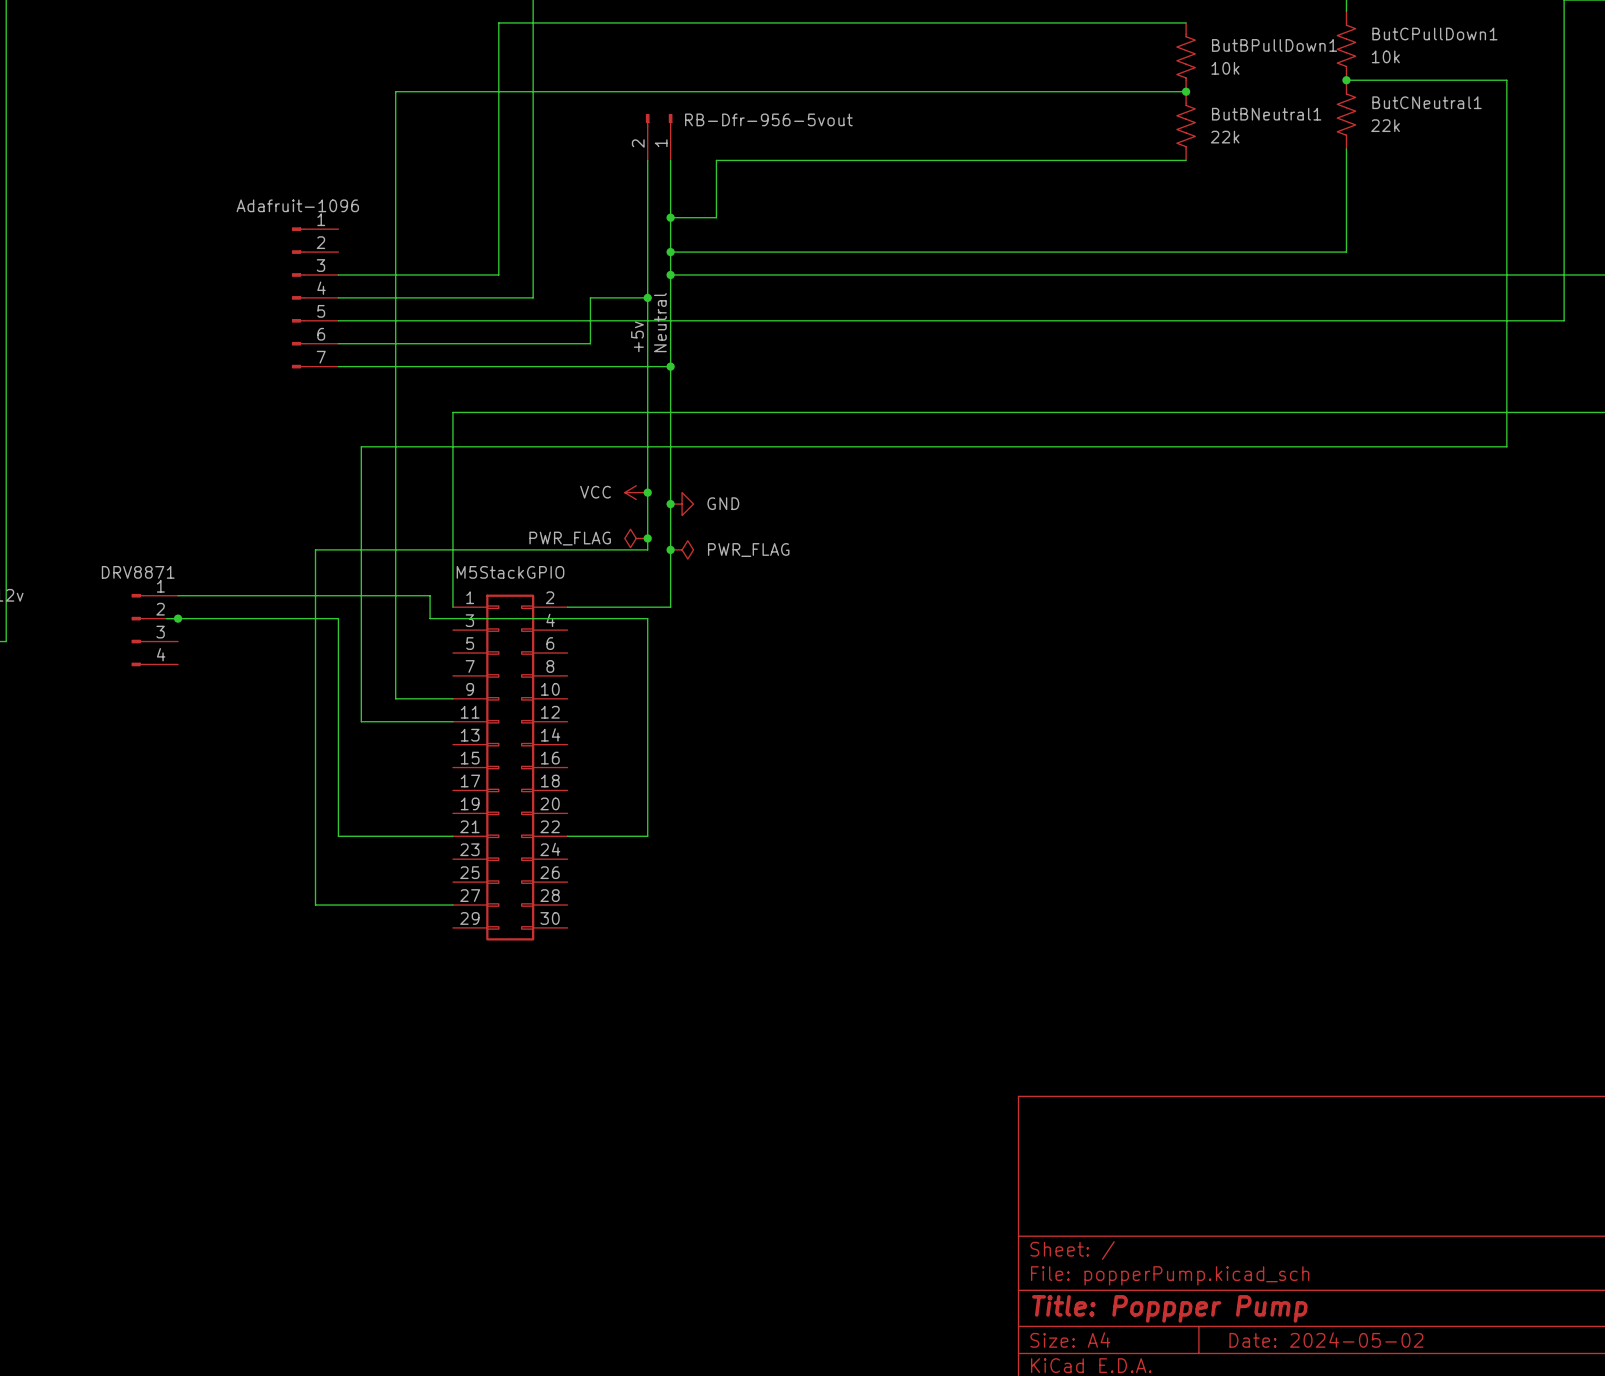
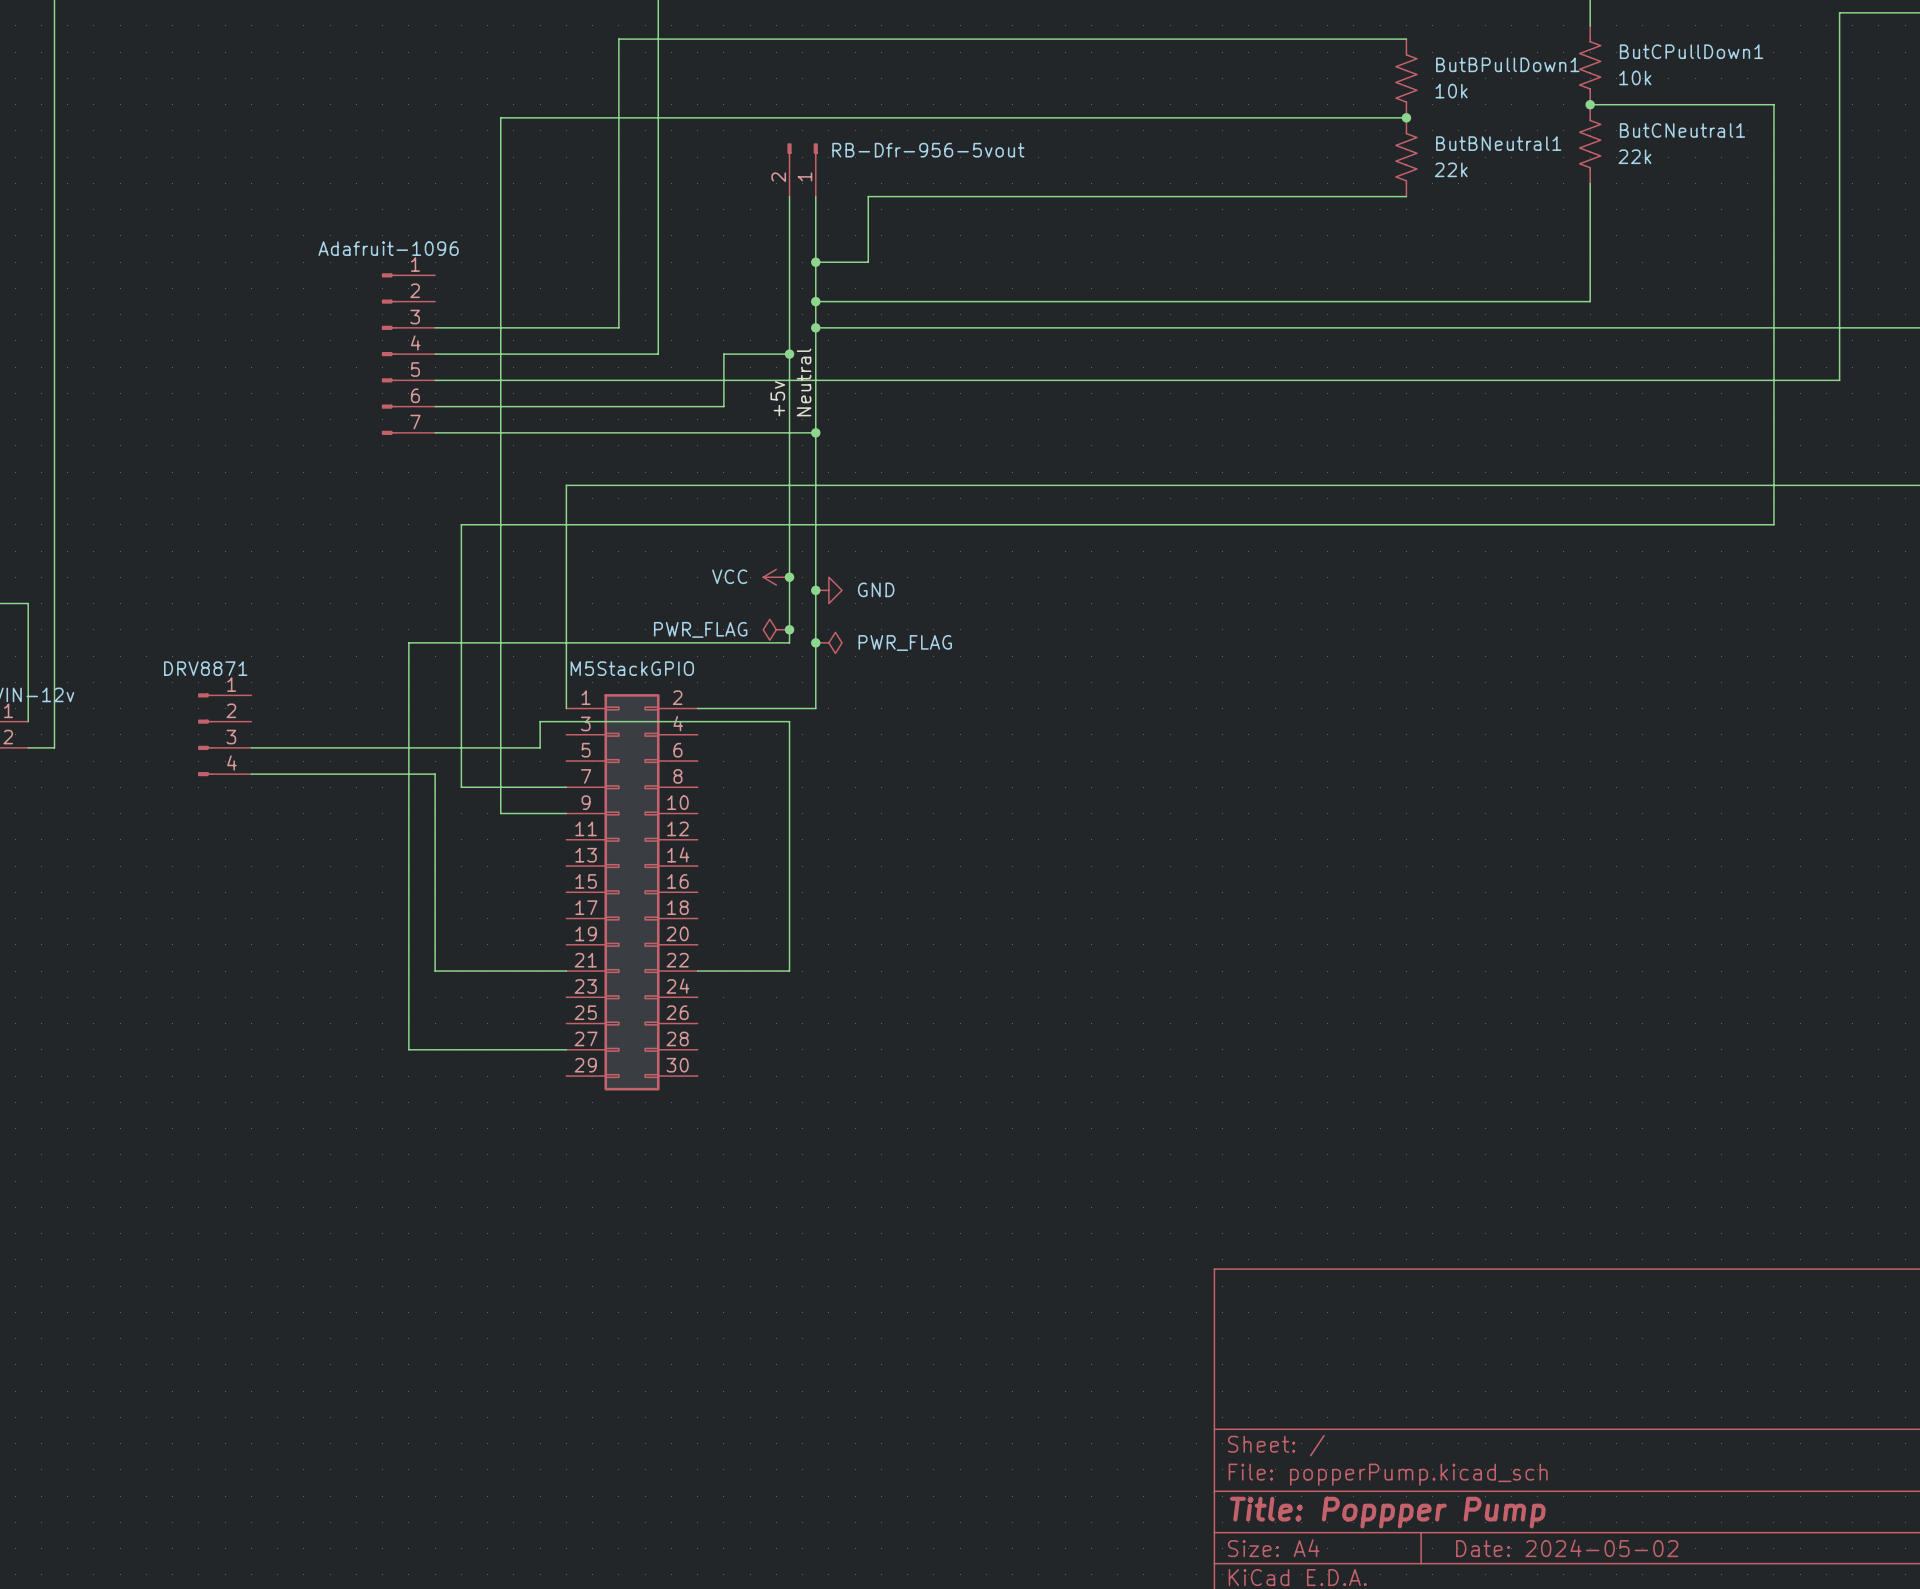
wire: (178, 595) (430, 595) (430, 618) -> (251, 747) (540, 747) (540, 721)
wire: (166, 618) (338, 618) (338, 664) -> (251, 774) (435, 774)
junction: (178, 618) -> none
wire: (361, 675) (361, 721) (452, 721) -> (461, 787) (566, 787)

